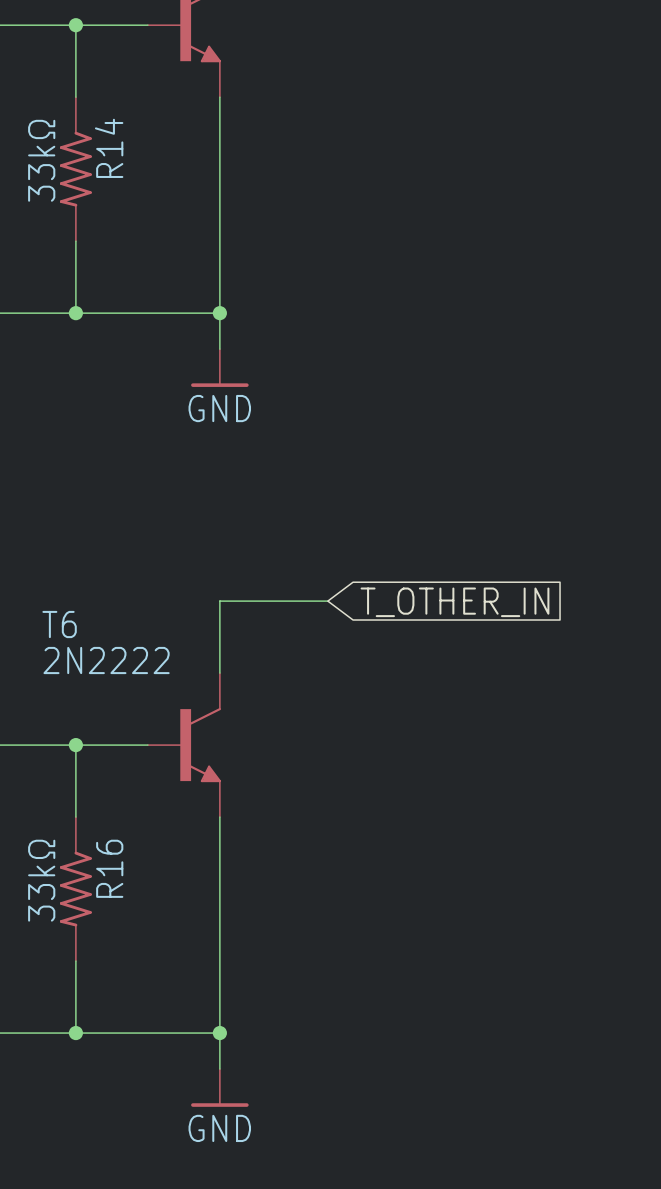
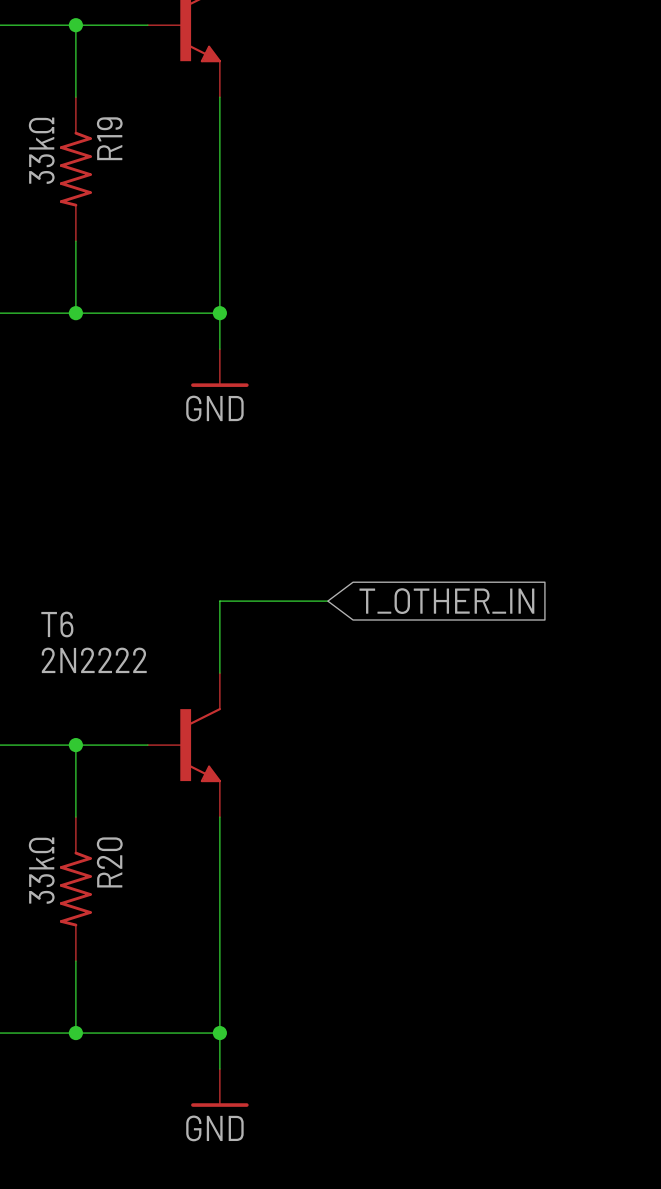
R14 name: R14 (109, 148) -> R19 (109, 138)
R16 name: R16 (109, 868) -> R20 (109, 862)

